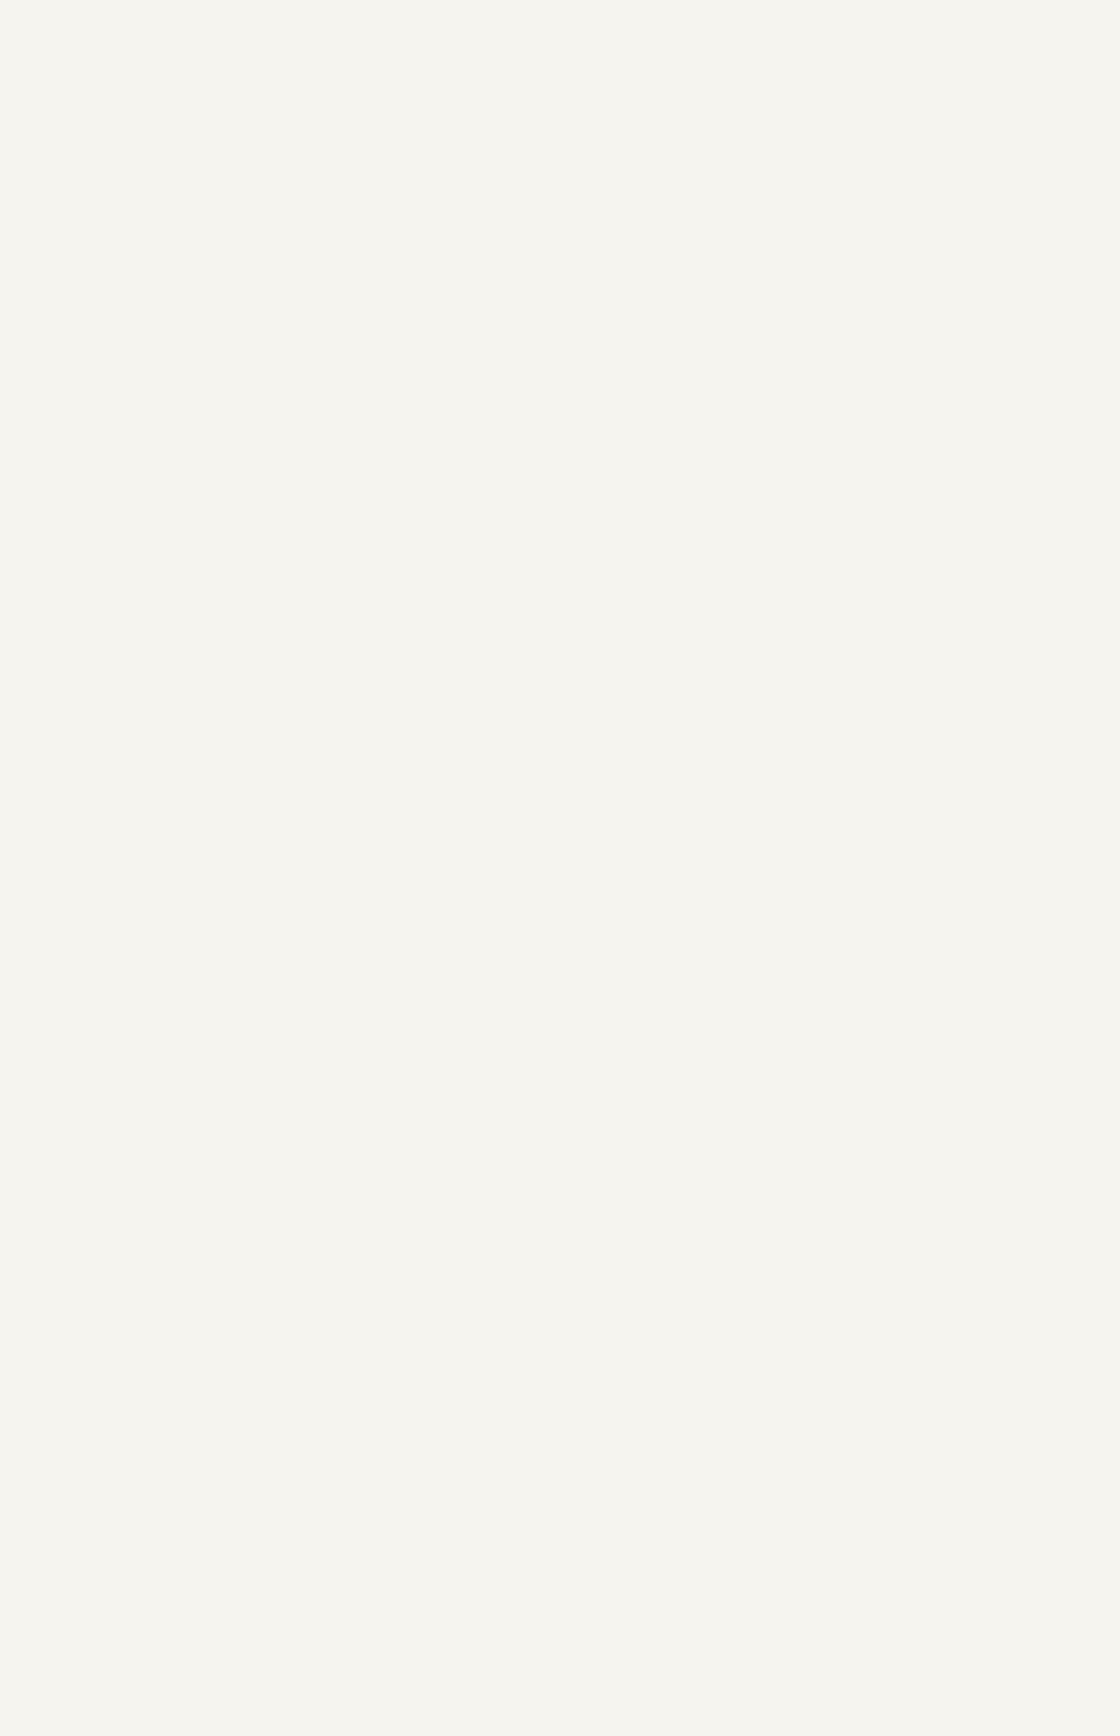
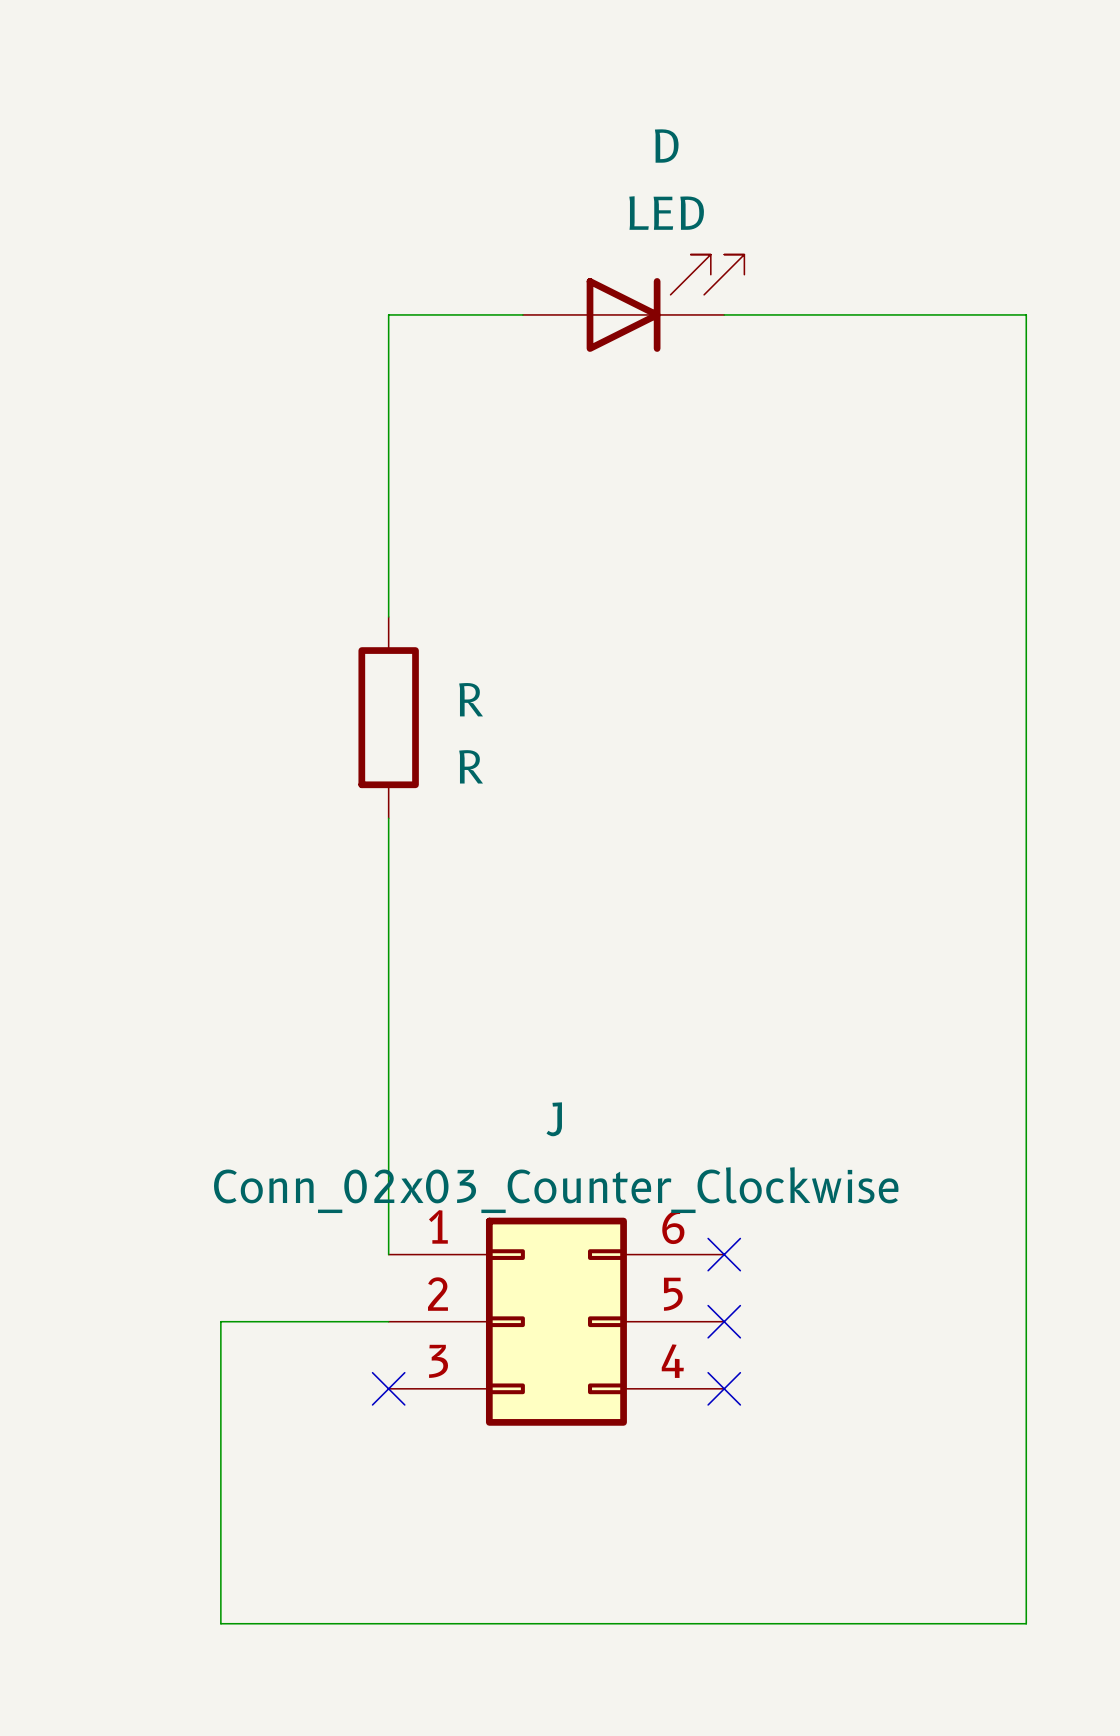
D: none -> LED (633, 303)
wire: none -> (522, 314) (388, 314) (388, 616)
wire: none -> (724, 314) (1026, 314) (1026, 1623) (220, 1623) (220, 1321) (388, 1321)
R: none -> R (388, 717)
wire: none -> (388, 818) (388, 1254)
no-connect mark: none -> (724, 1254)
J: none -> Conn_02x03_Counter_Clockwise (556, 1321)
no-connect mark: none -> (724, 1321)
no-connect mark: none -> (388, 1388)
no-connect mark: none -> (724, 1388)

